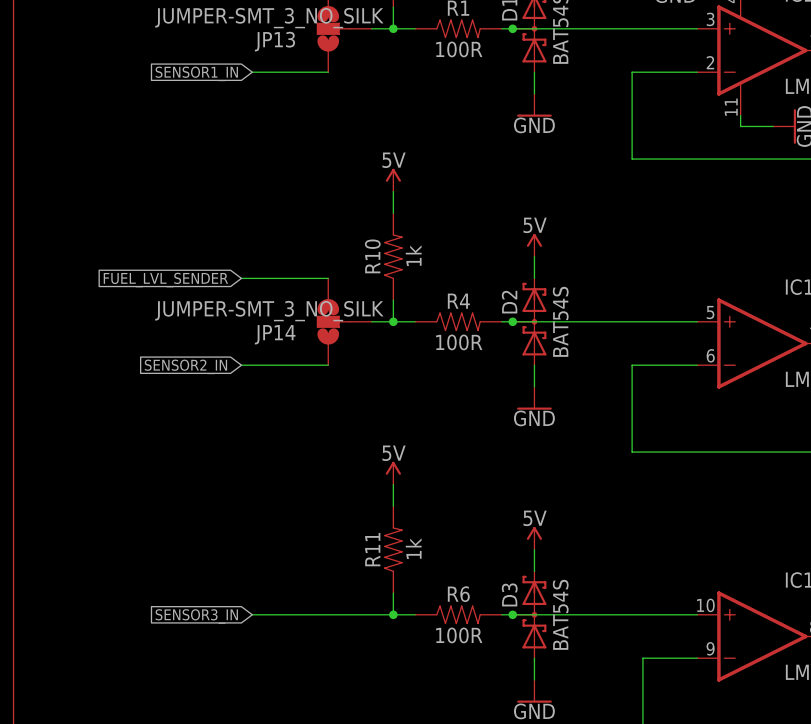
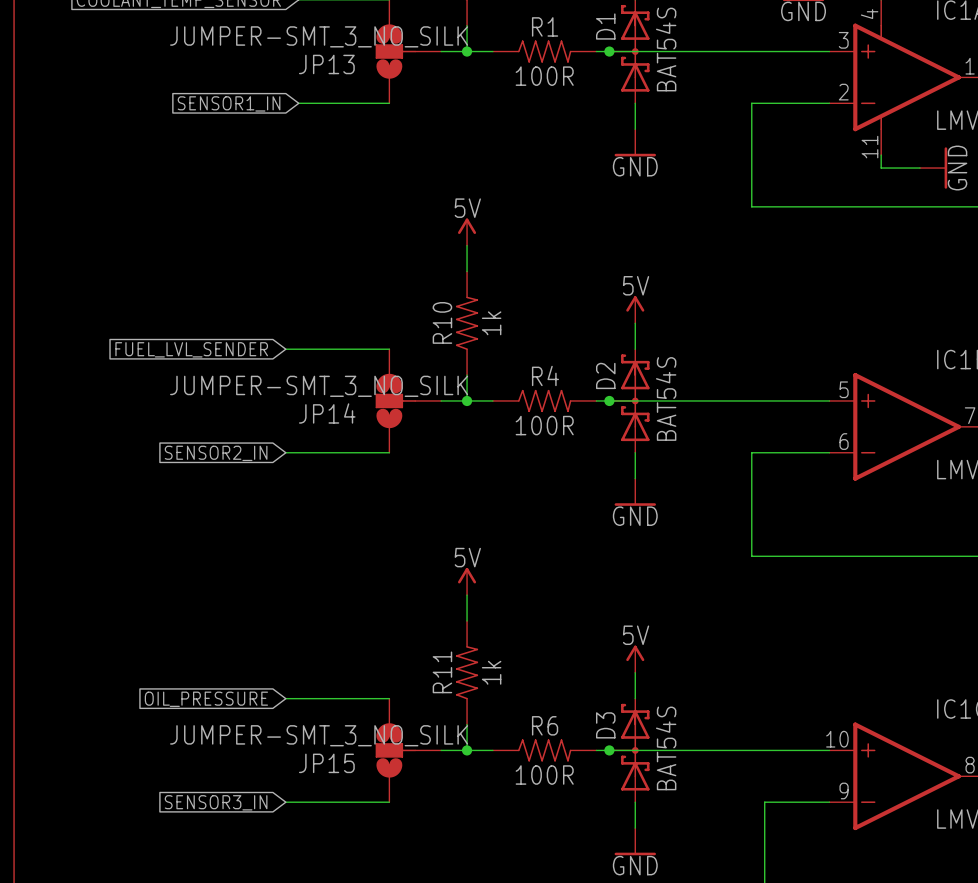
wire: none -> (285, 698) (389, 698)
global label: none -> OIL_PRESSURE (206, 699)
wire: (252, 614) (371, 614) -> none
JP15: none -> JUMPER-SMT_3_NO_SILK (408, 750)
global label position: SENSOR3_IN (196, 616) -> SENSOR3_IN (216, 802)
wire: none -> (285, 802) (389, 802)

